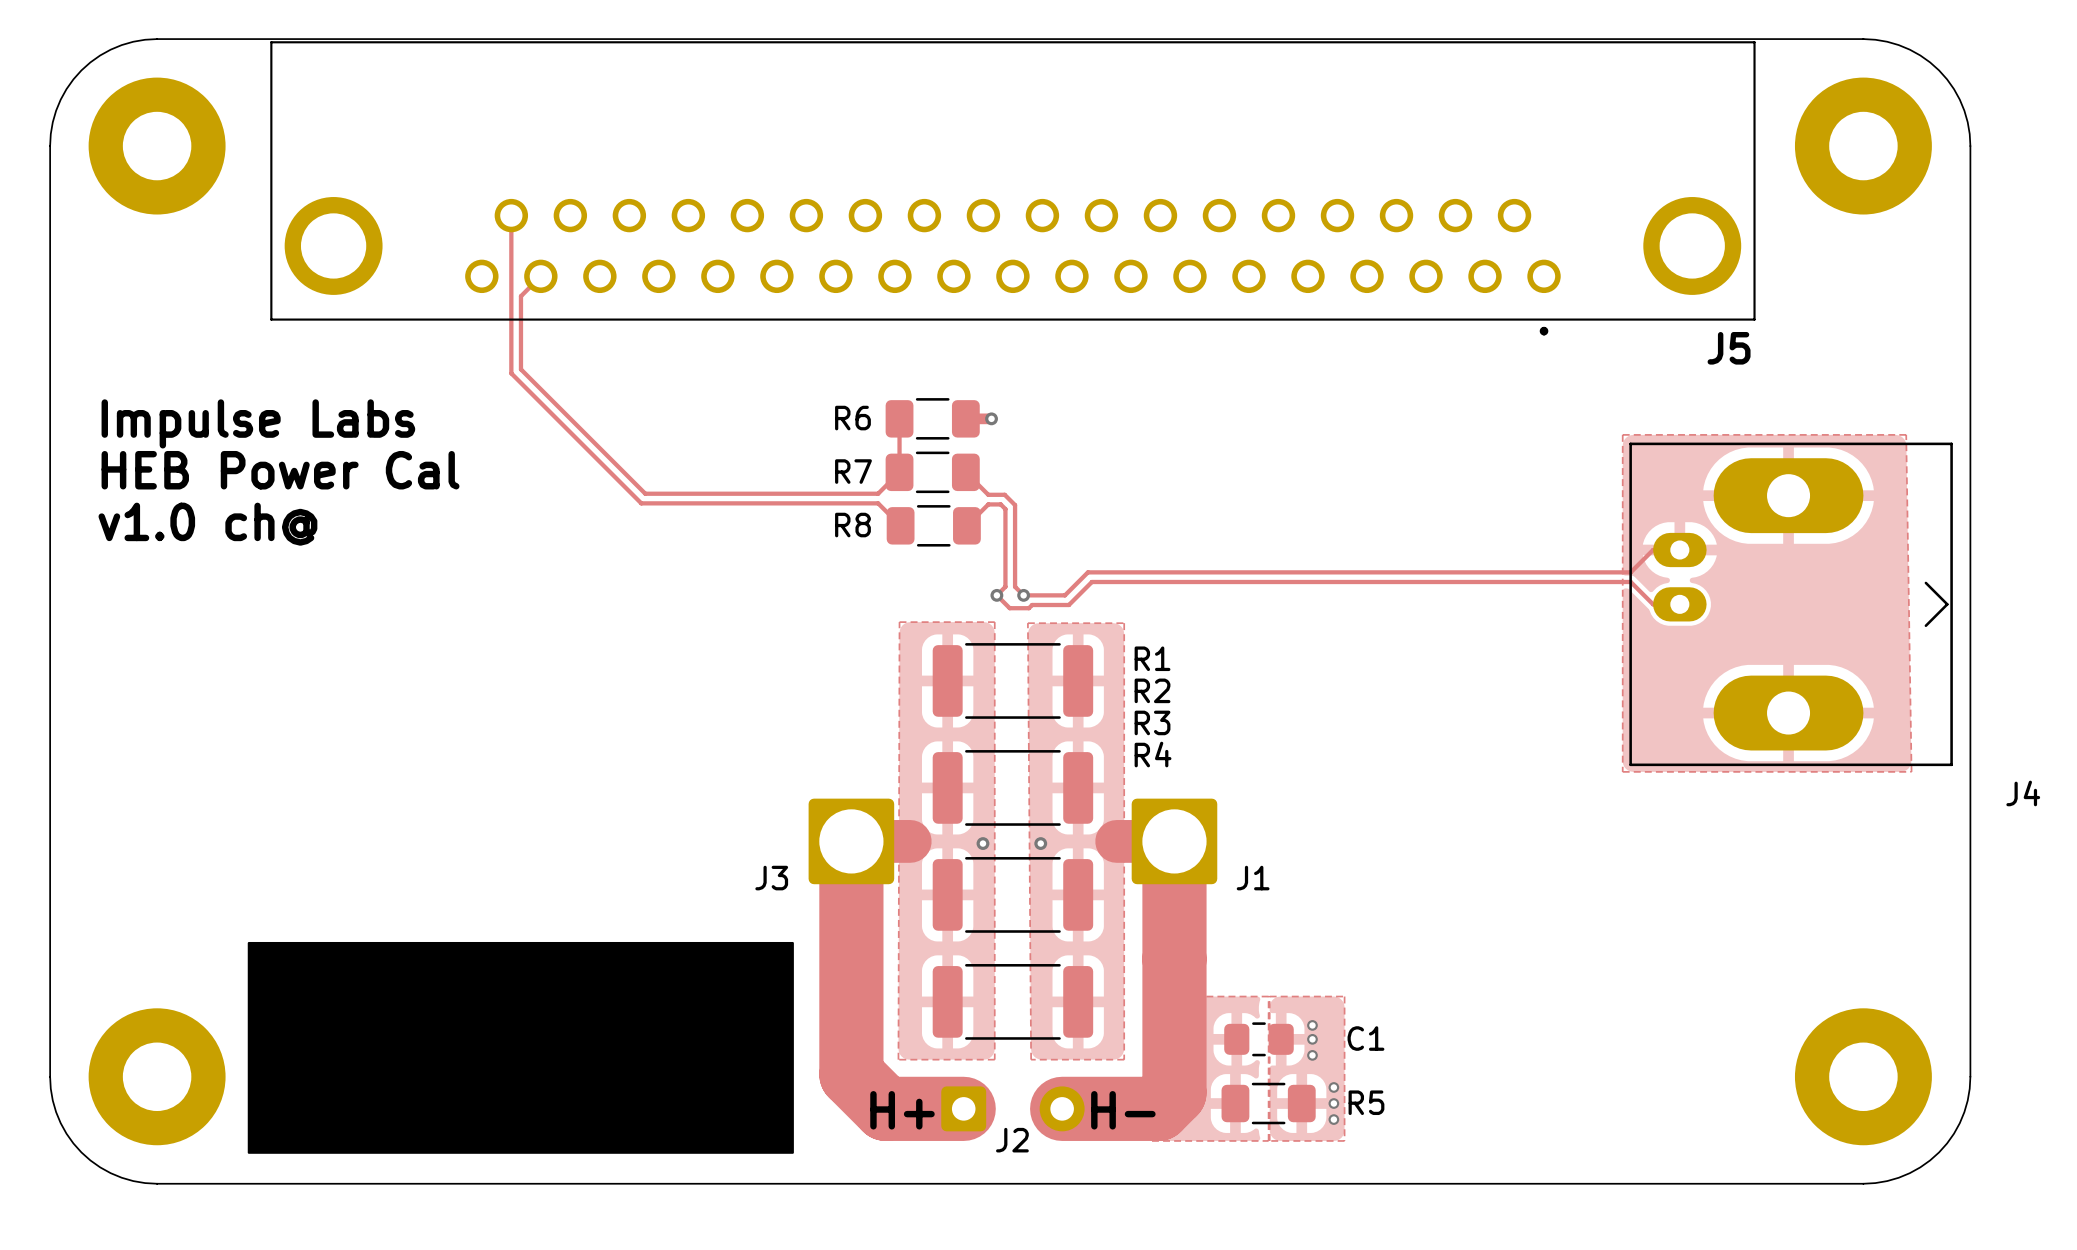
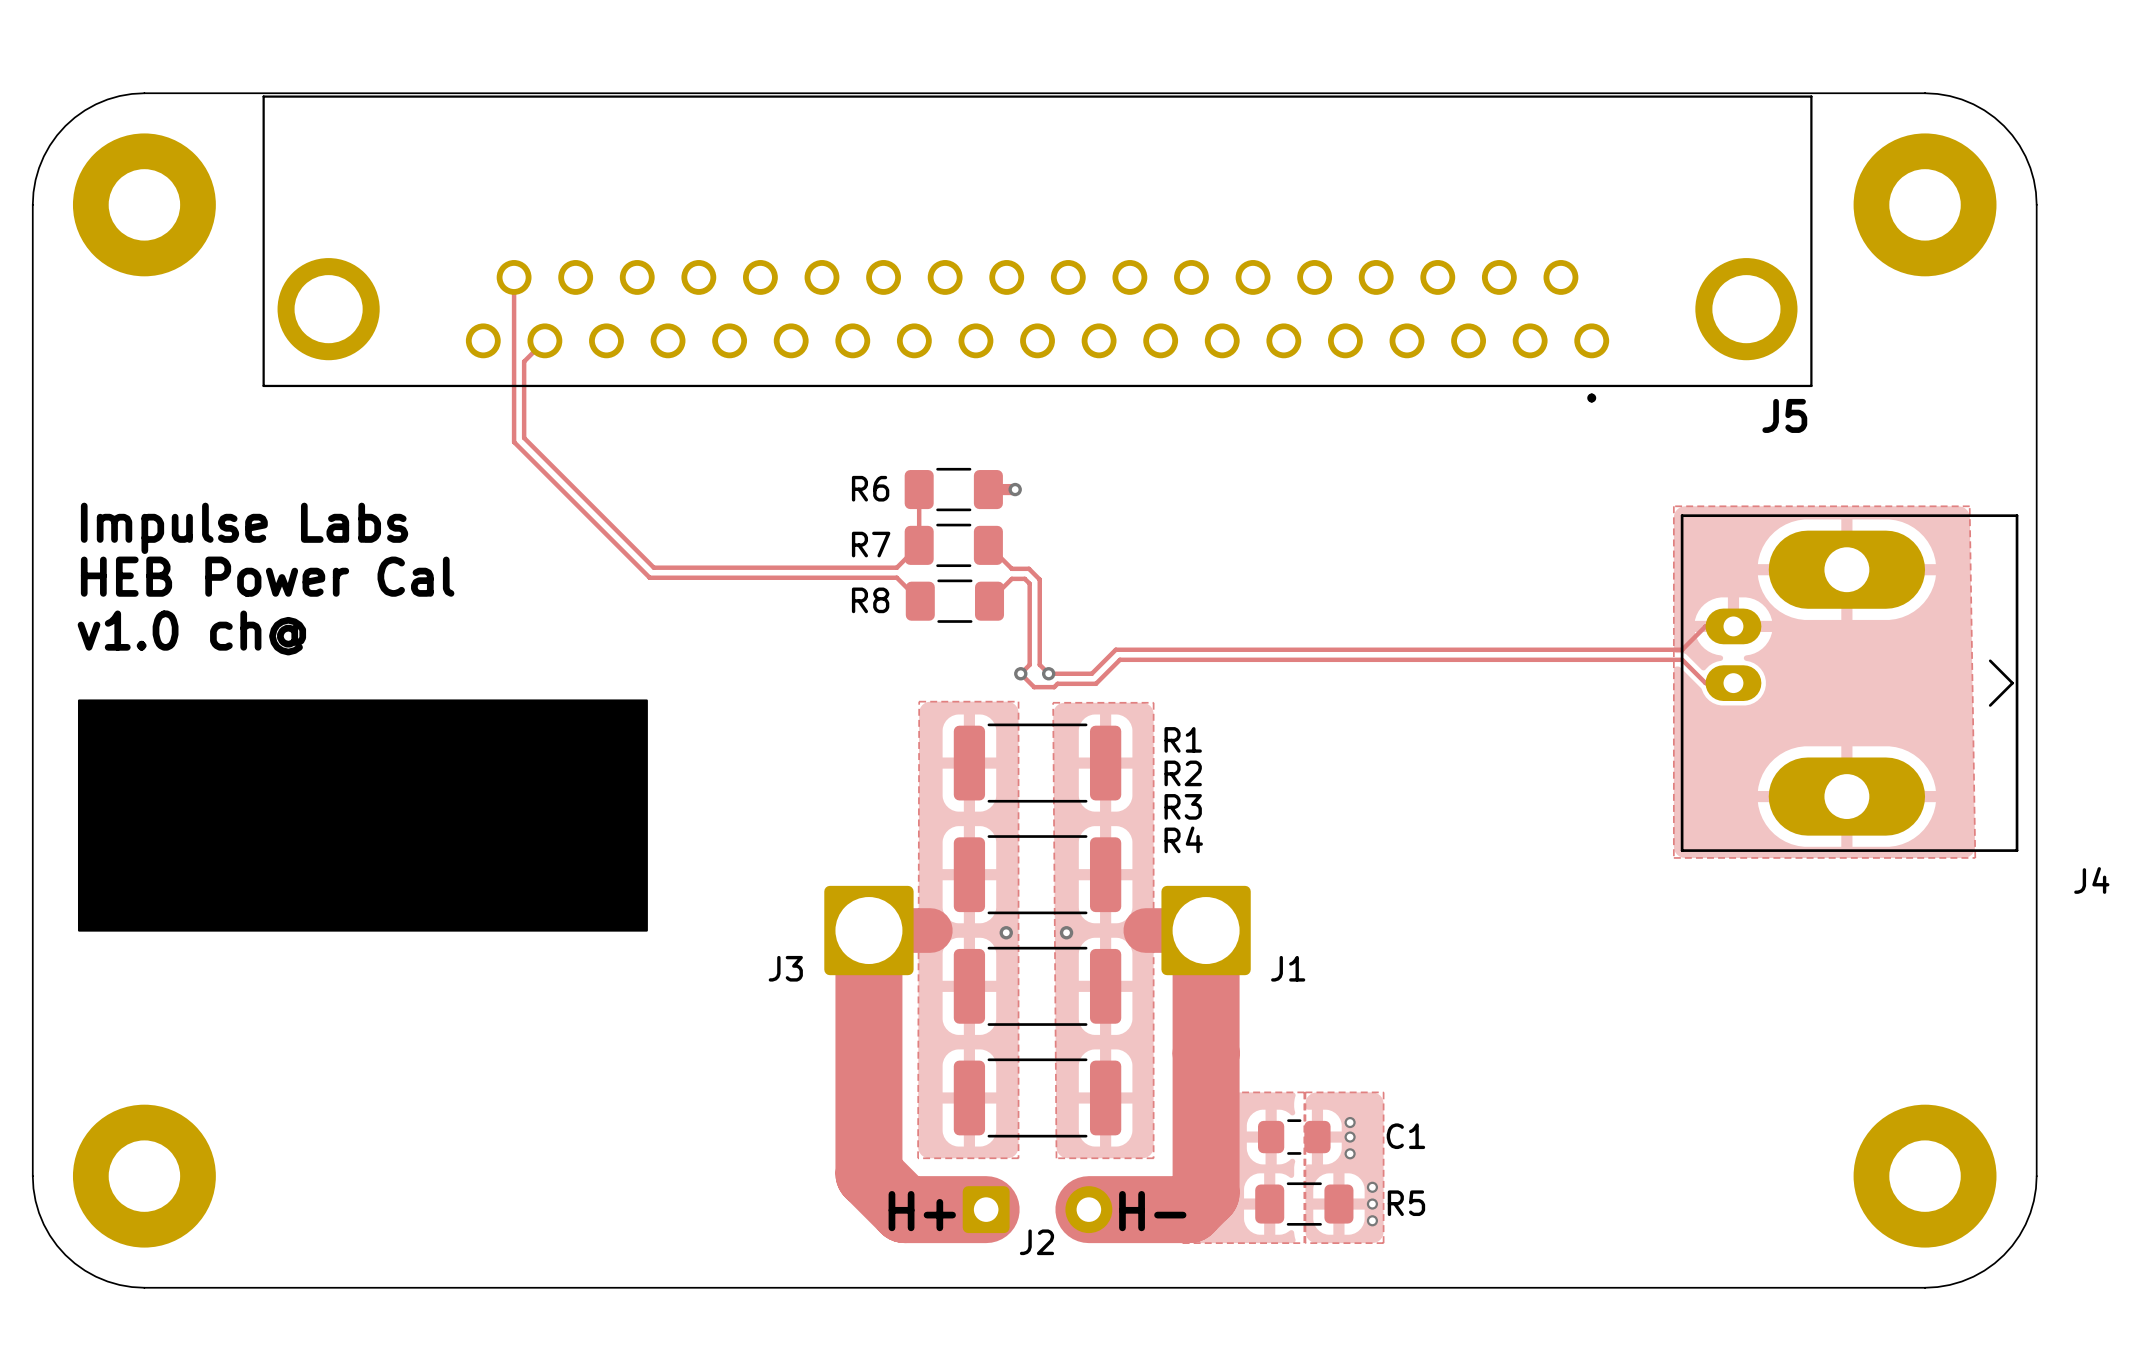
text position: Impulse Labs (258, 423) -> Impulse Labs (244, 528)
text position: HEB Power Cal (280, 470) -> HEB Power Cal (267, 576)
text position: v1.0 ch@ (207, 524) -> v1.0 ch@ (191, 632)
drawing: none -> [77, 699, 648, 932]
drawing: [247, 941, 794, 1154] -> none

